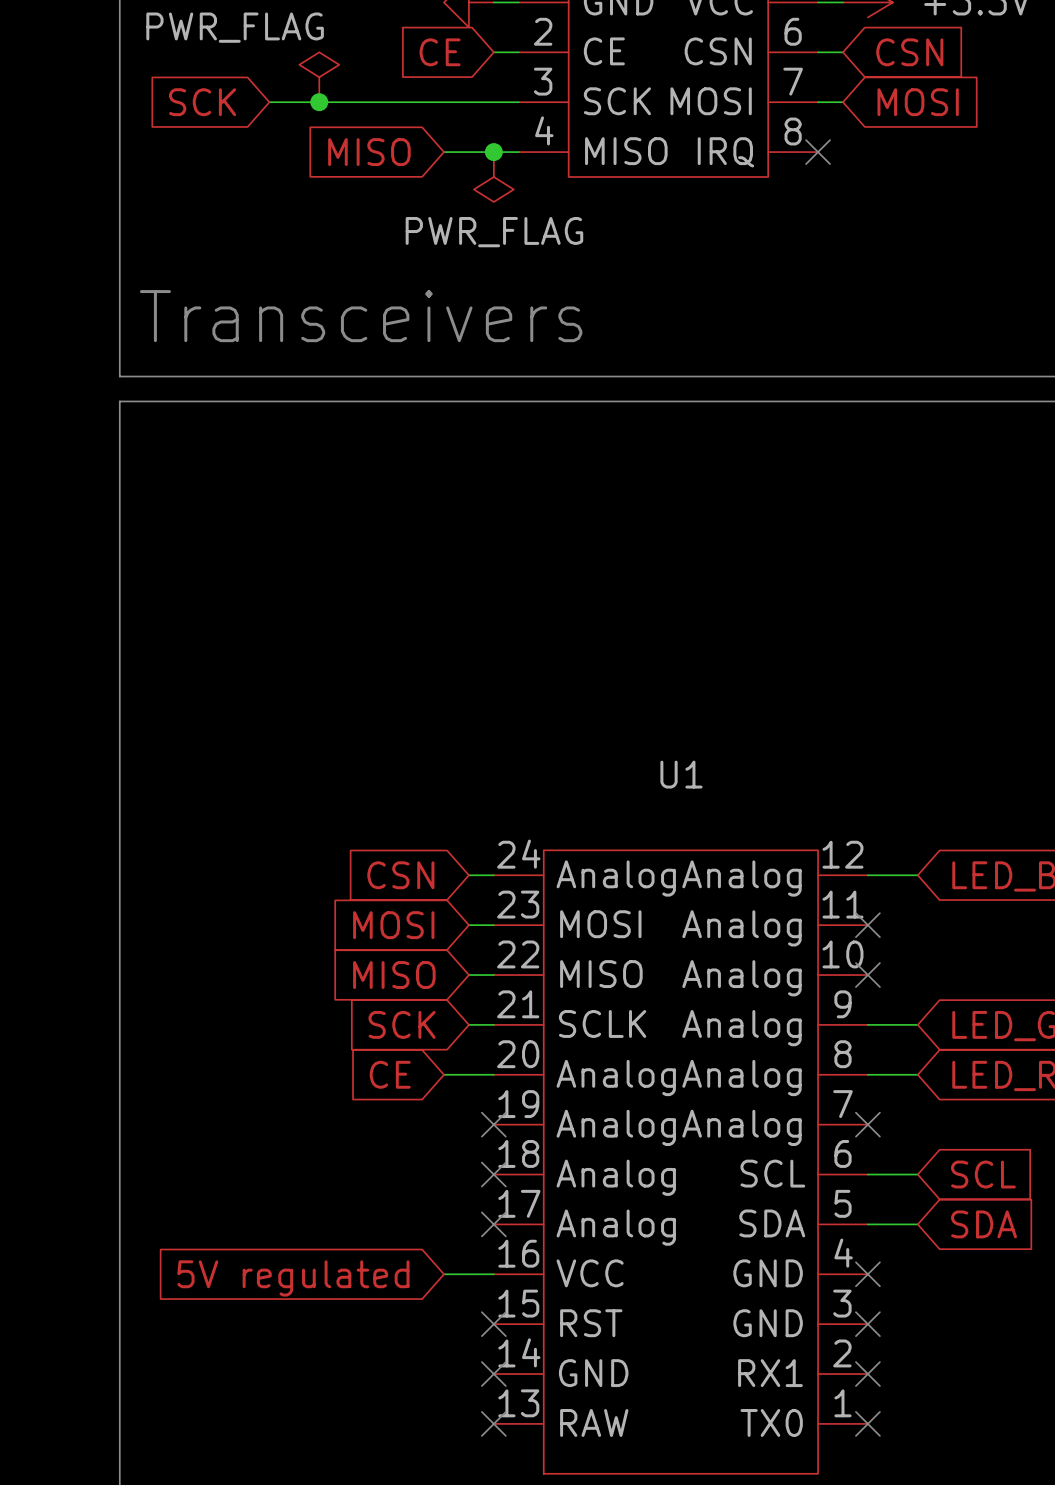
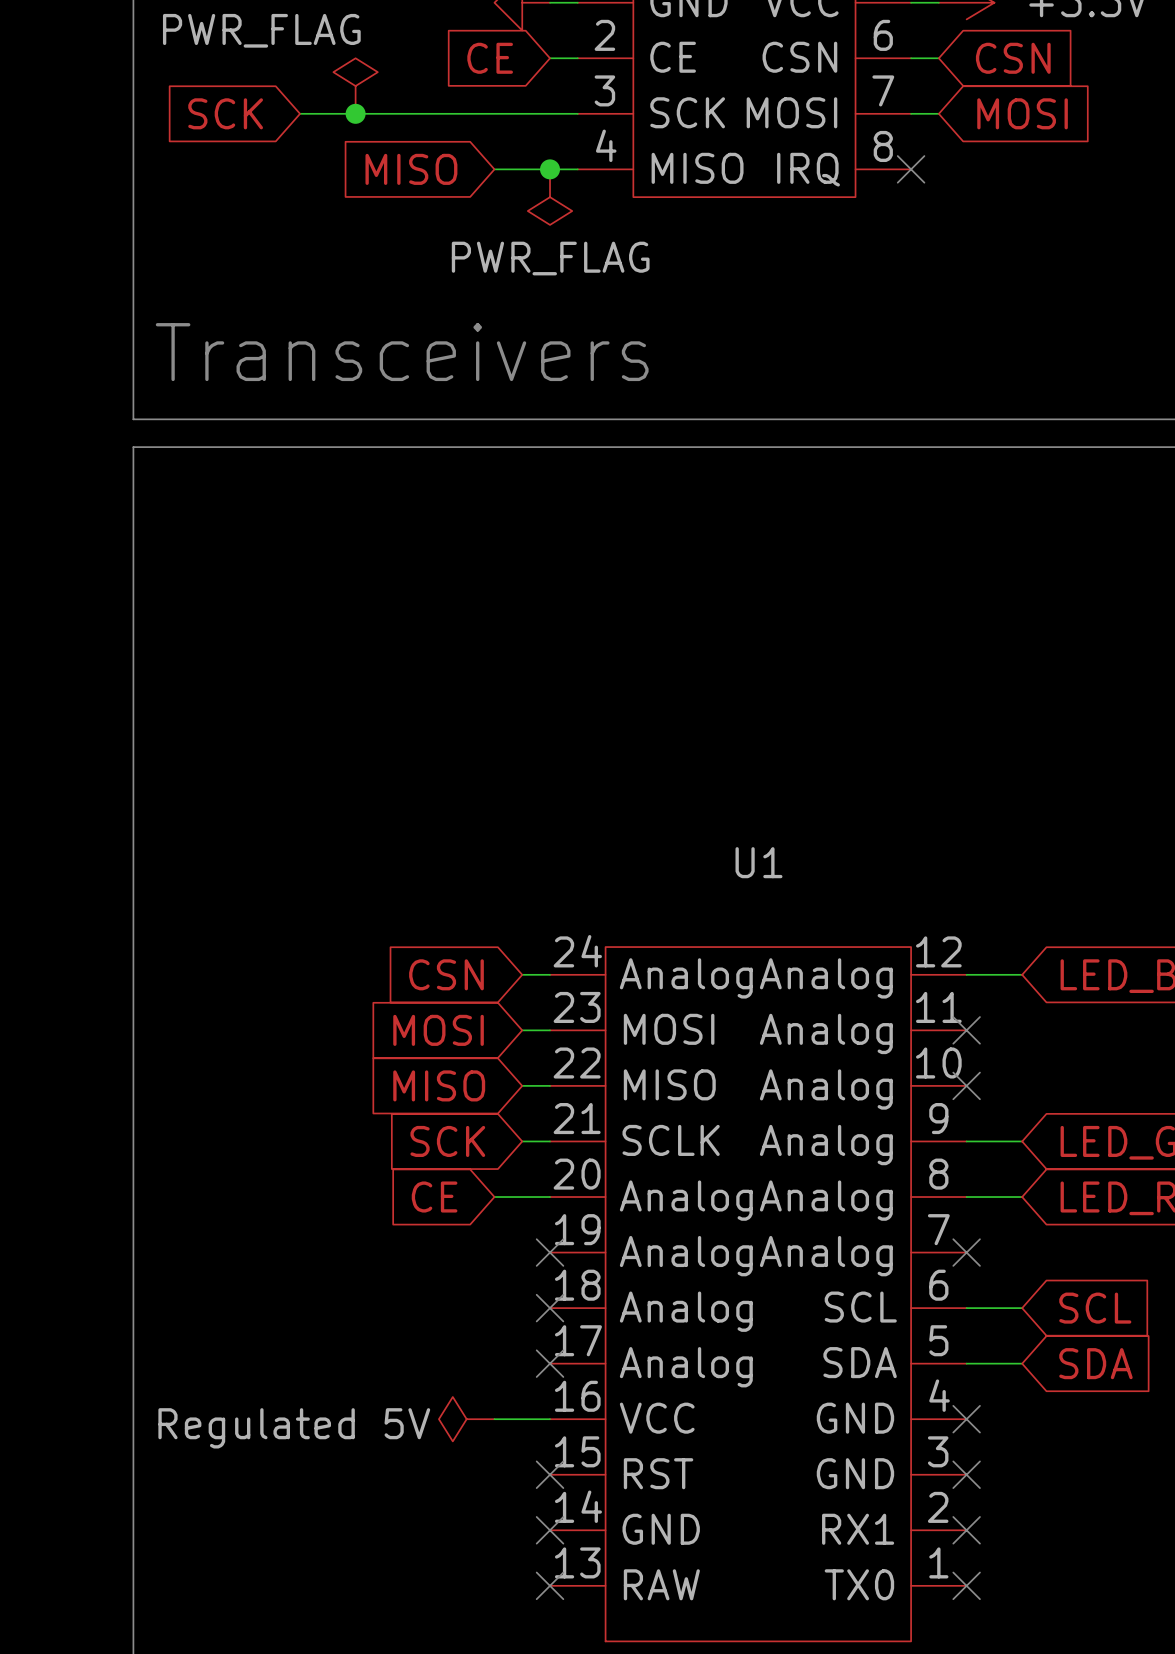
power symbol: none -> Regulated 5V (466, 1419)
global label: 5V regulated (293, 1278) -> none

